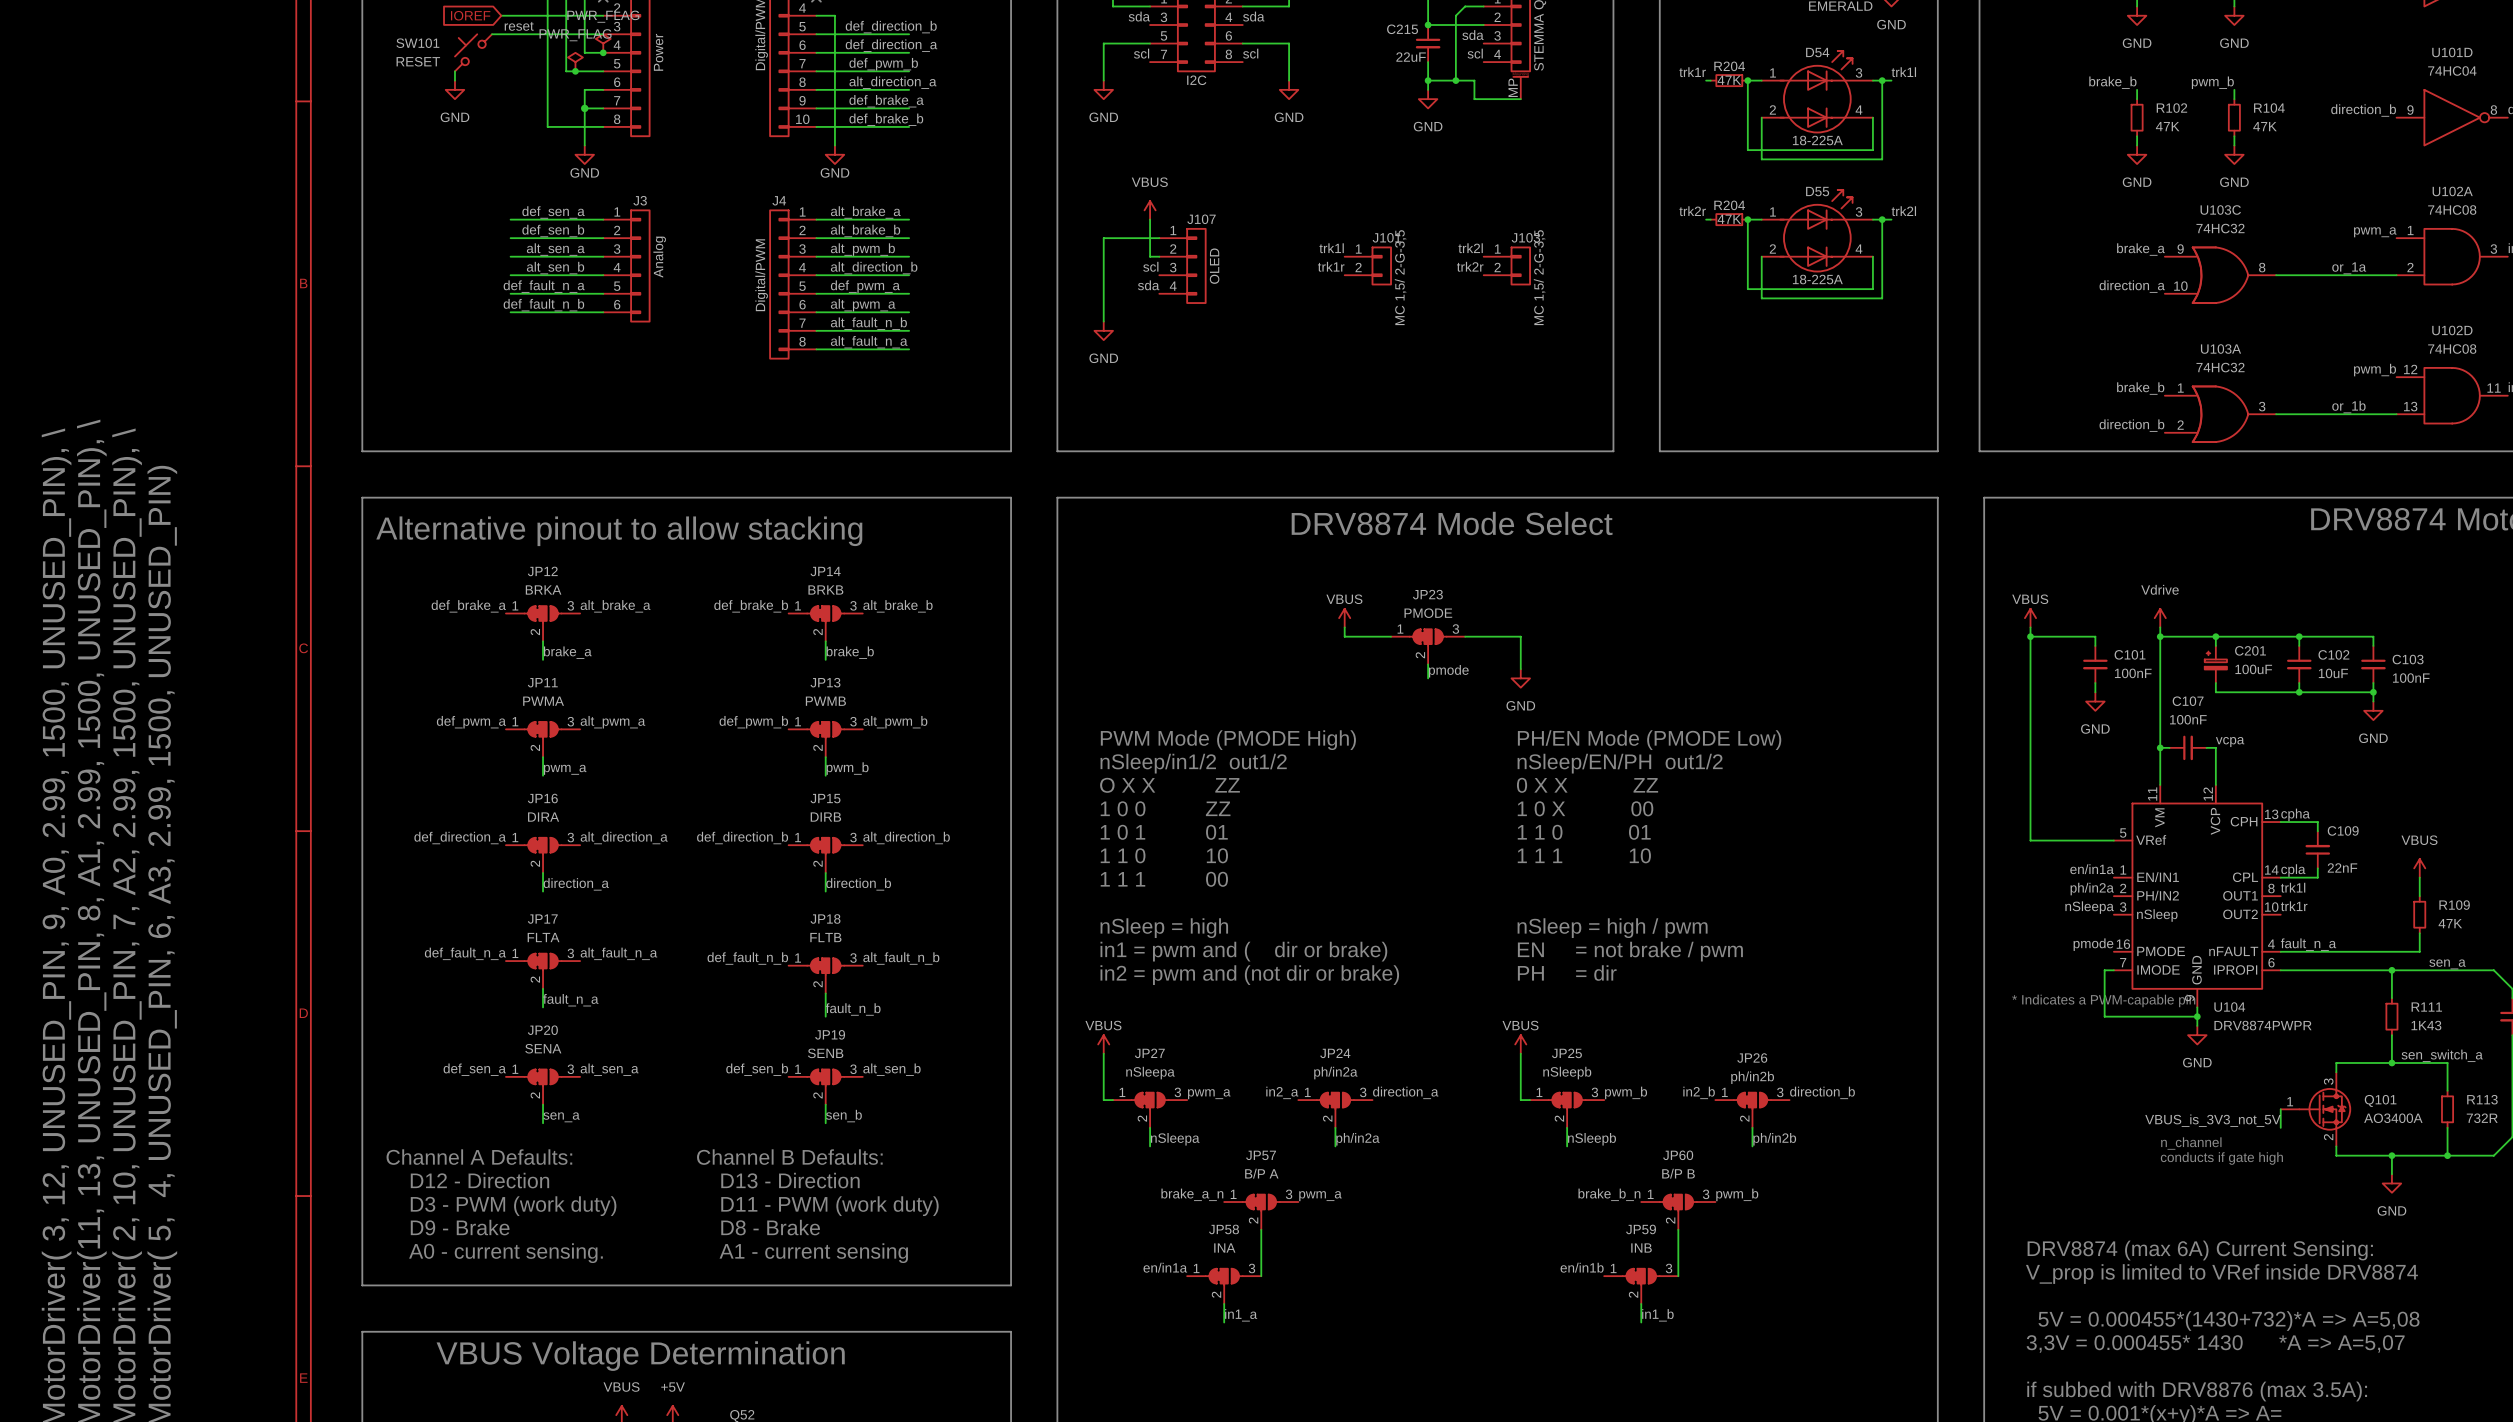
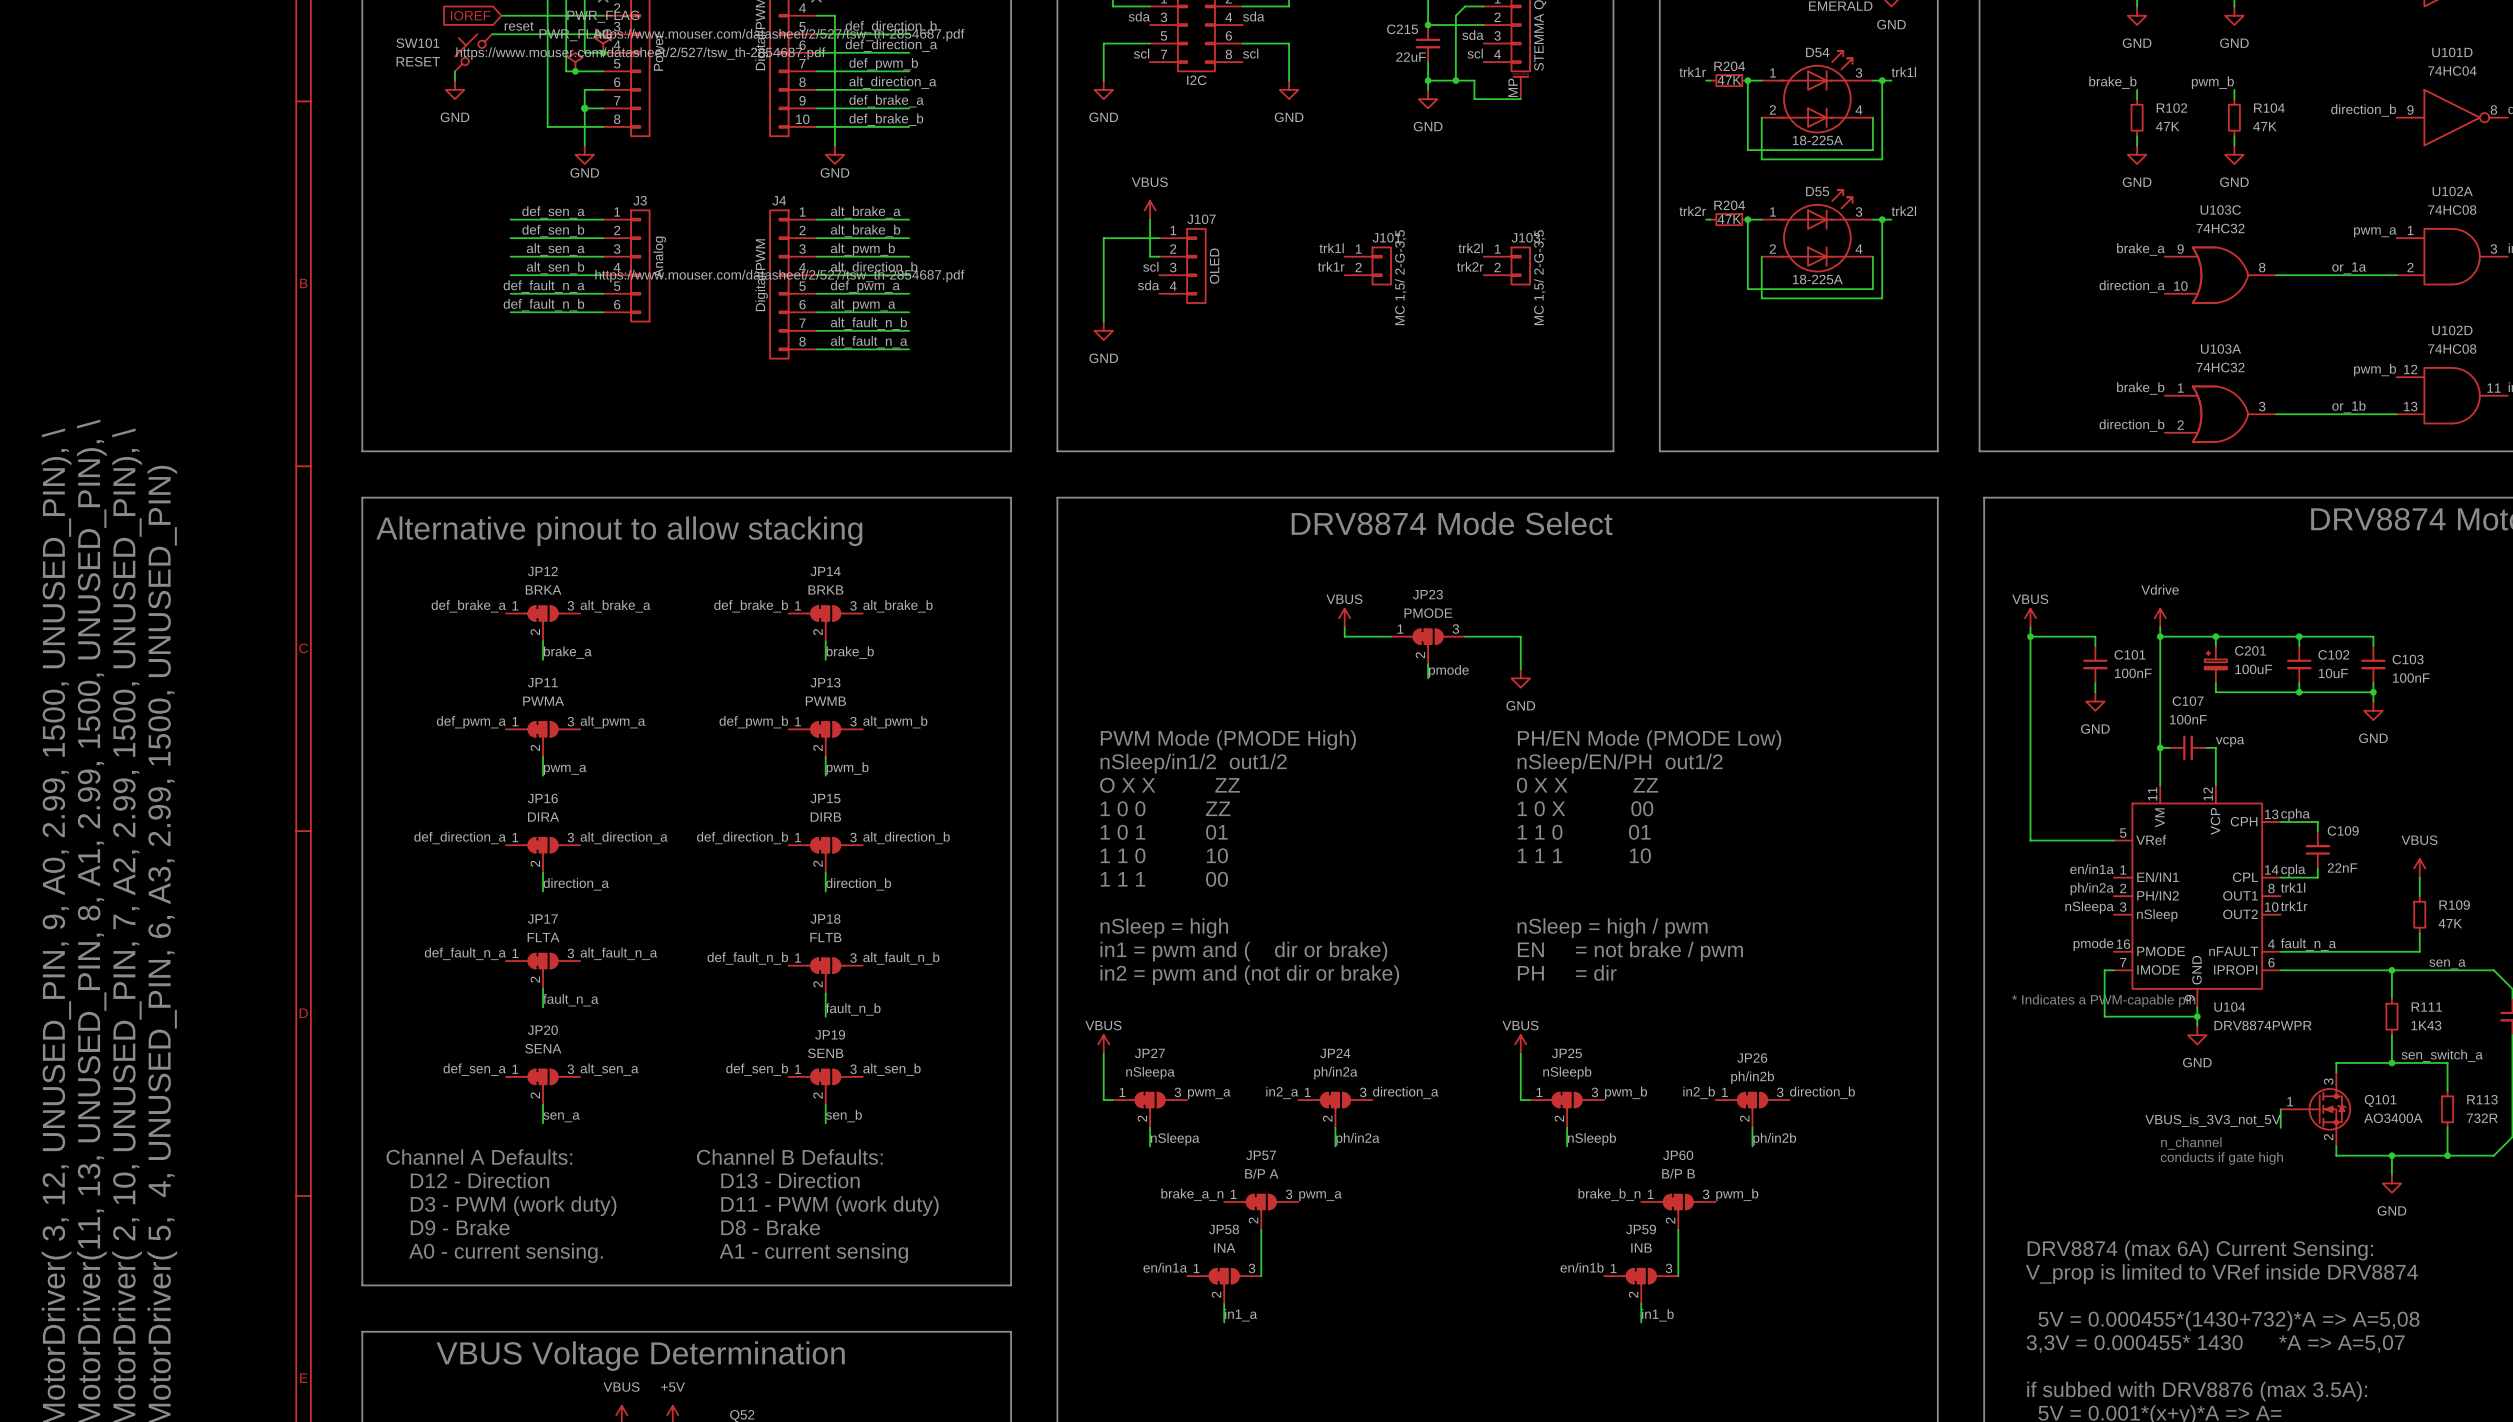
part text: none -> https://www.mouser.com/datasheet/2/527/tsw_th-2854687.pdf (779, 35)
part text: none -> https://www.mouser.com/datasheet/2/527/tsw_th-2854687.pdf (640, 53)
J4 text: none -> https://www.mouser.com/datasheet/2/527/tsw_th-2854687.pdf (779, 276)

